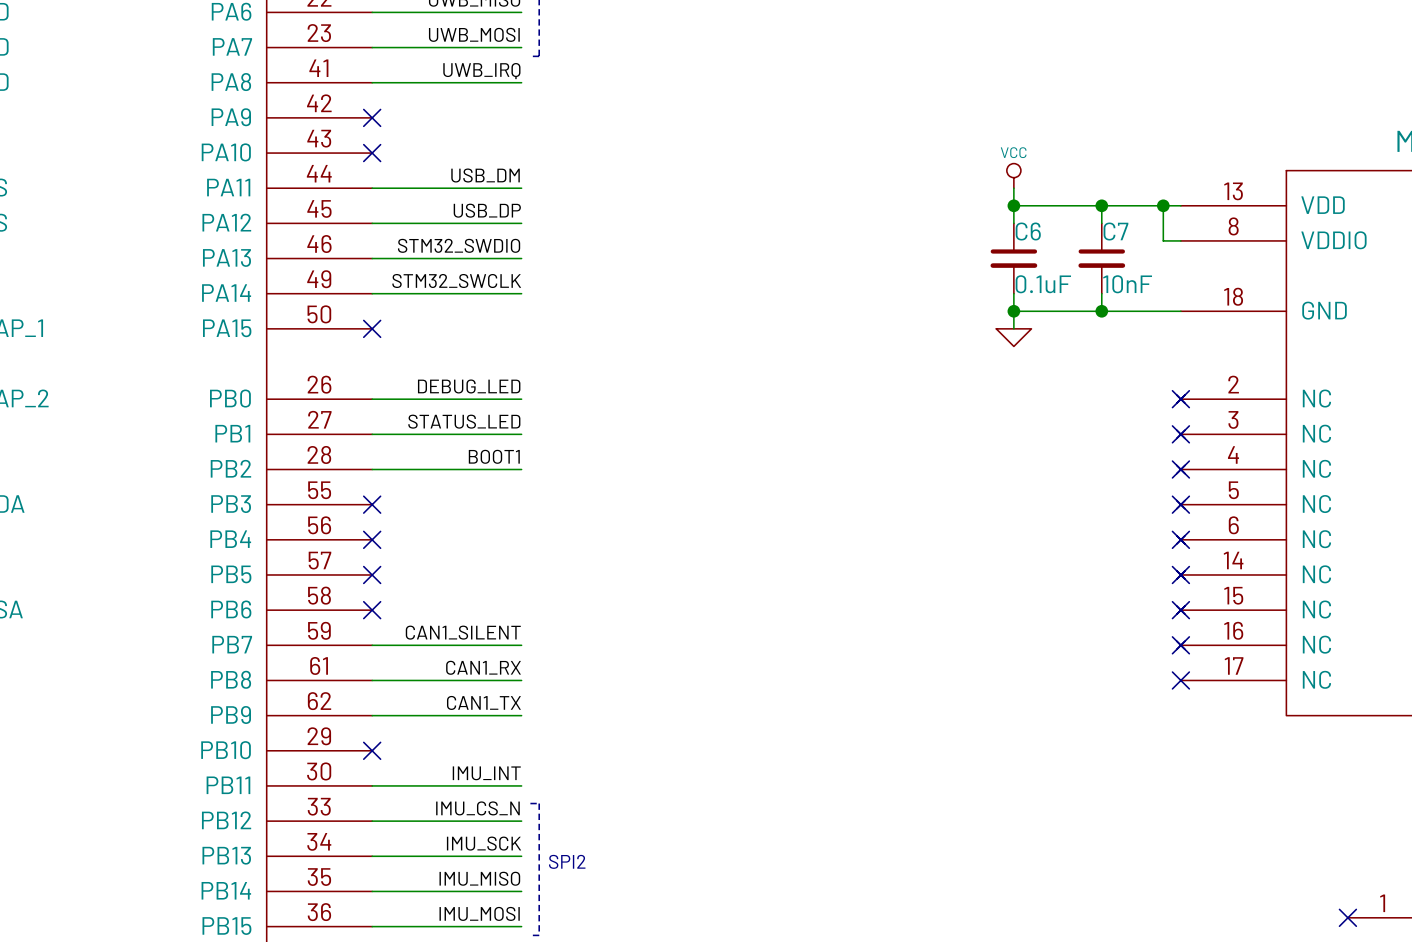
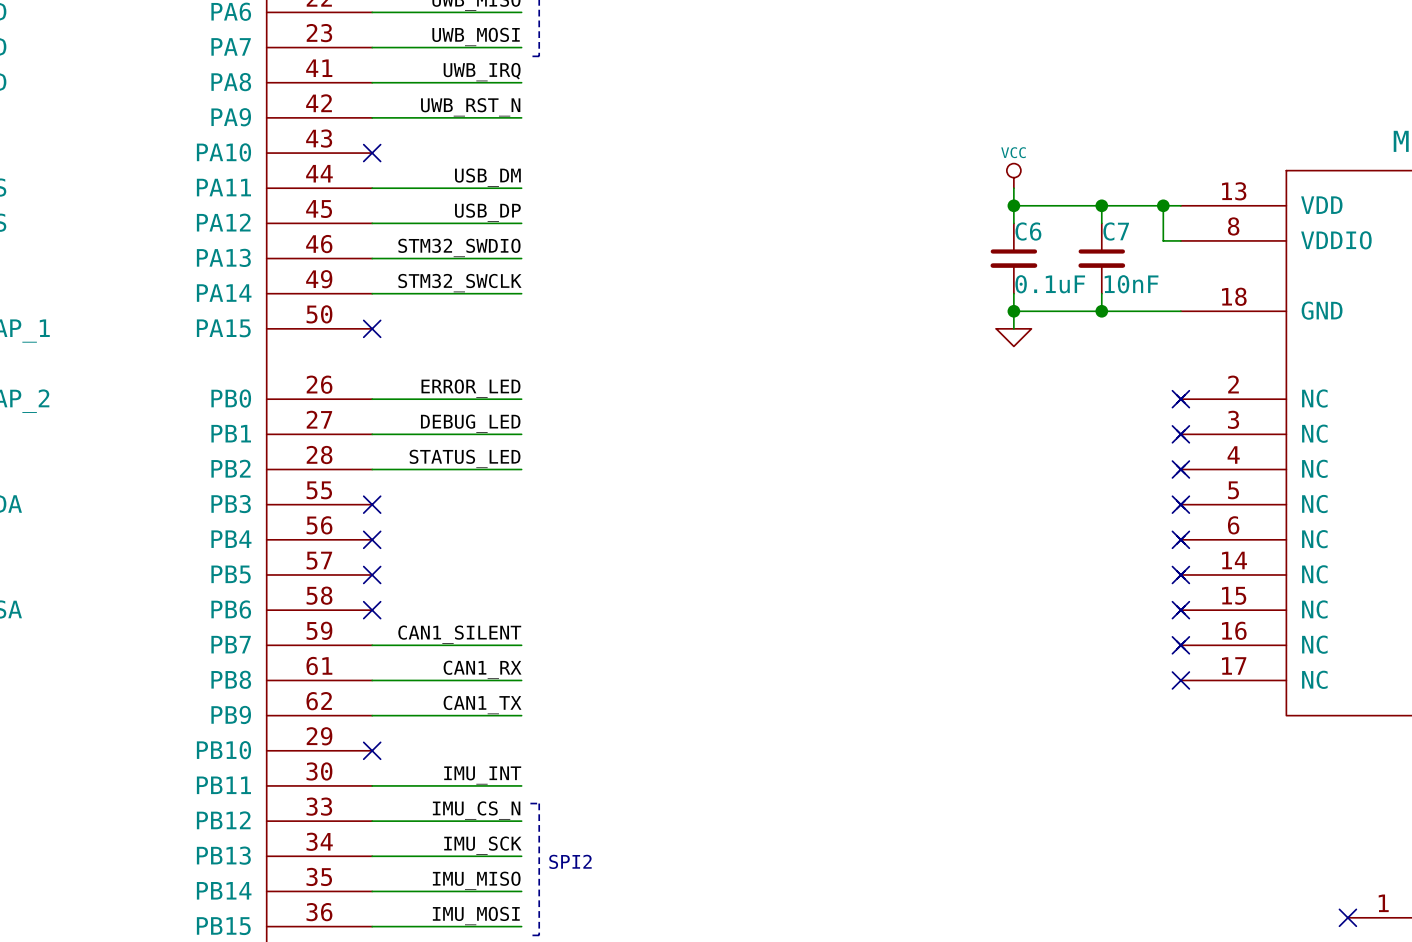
label: none -> UWB_RST_N (470, 107)
wire: none -> (372, 117) (521, 117)
no-connect mark: (372, 117) -> none
label: DEBUG_LED (469, 386) -> ERROR_LED (470, 388)
label: STATUS_LED (464, 421) -> DEBUG_LED (470, 423)
label: BOOT1 (494, 456) -> STATUS_LED (465, 458)

